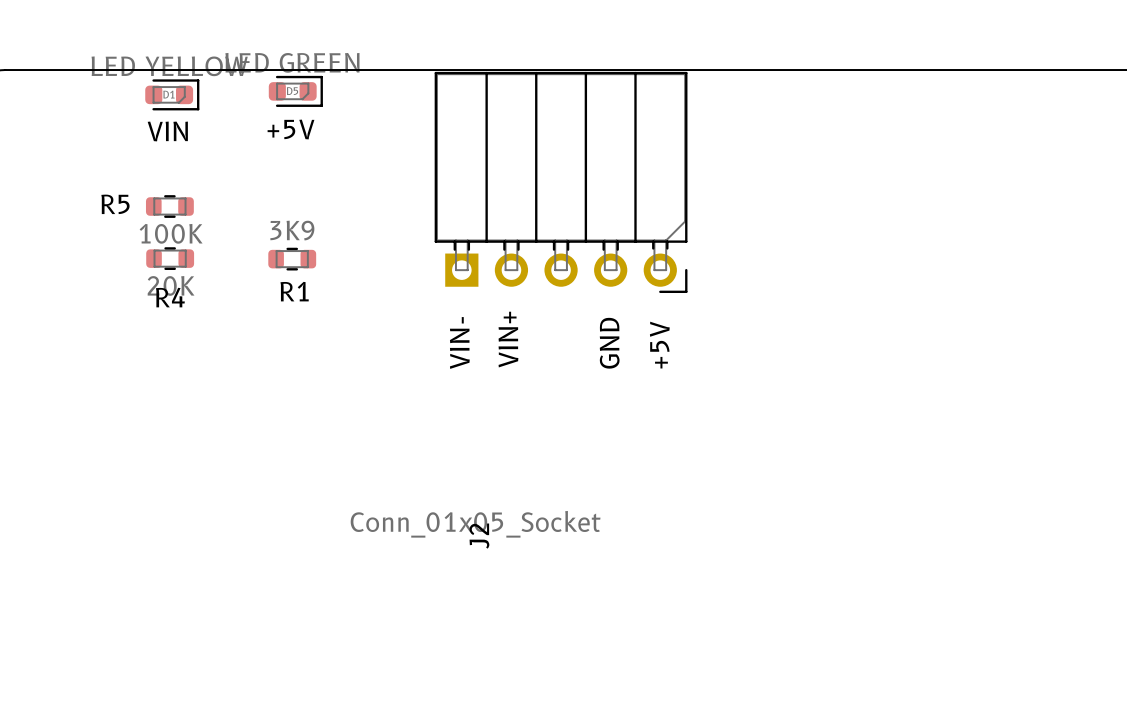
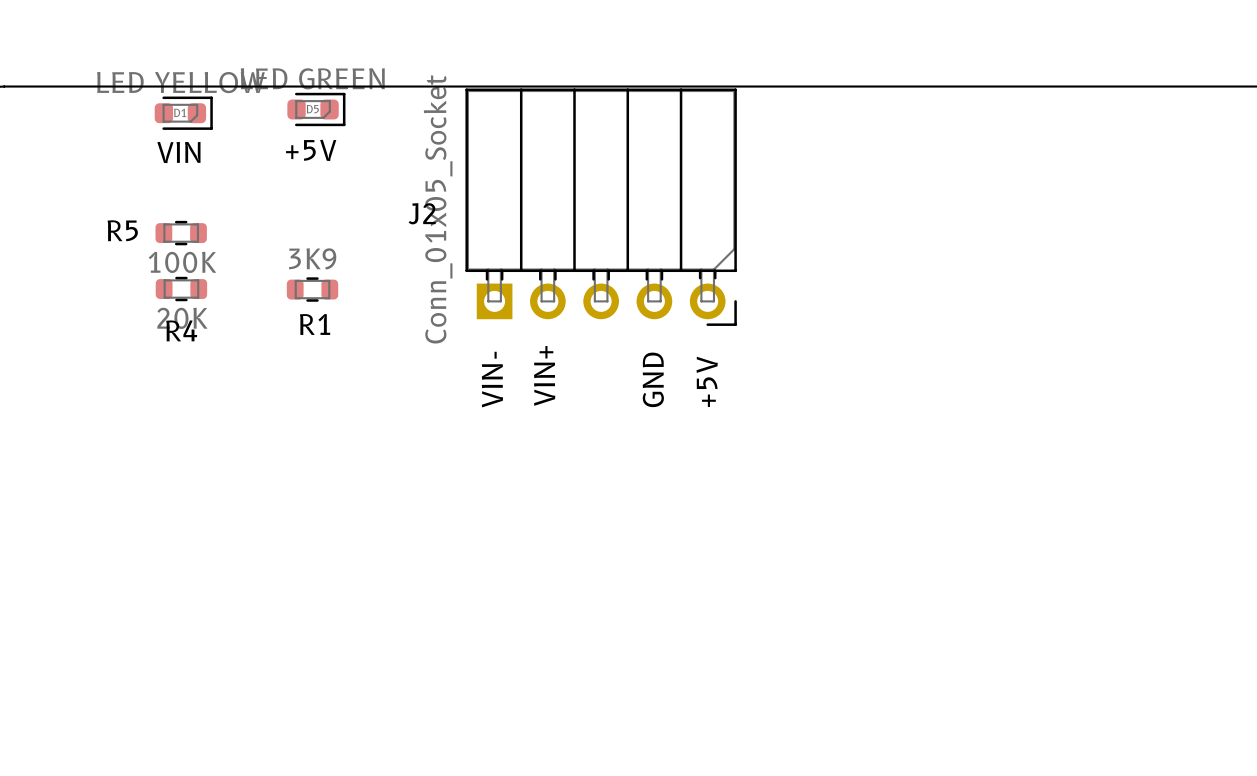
J2 value rotation: 0° (475, 524) -> 90° counterclockwise (438, 209)
J2 value position: Conn_01x05_Socket (475, 524) -> Conn_01x05_Socket (438, 209)
J2 name rotation: 0° (479, 536) -> 90° clockwise (422, 213)
J2 name position: J2 (479, 536) -> J2 (422, 213)

